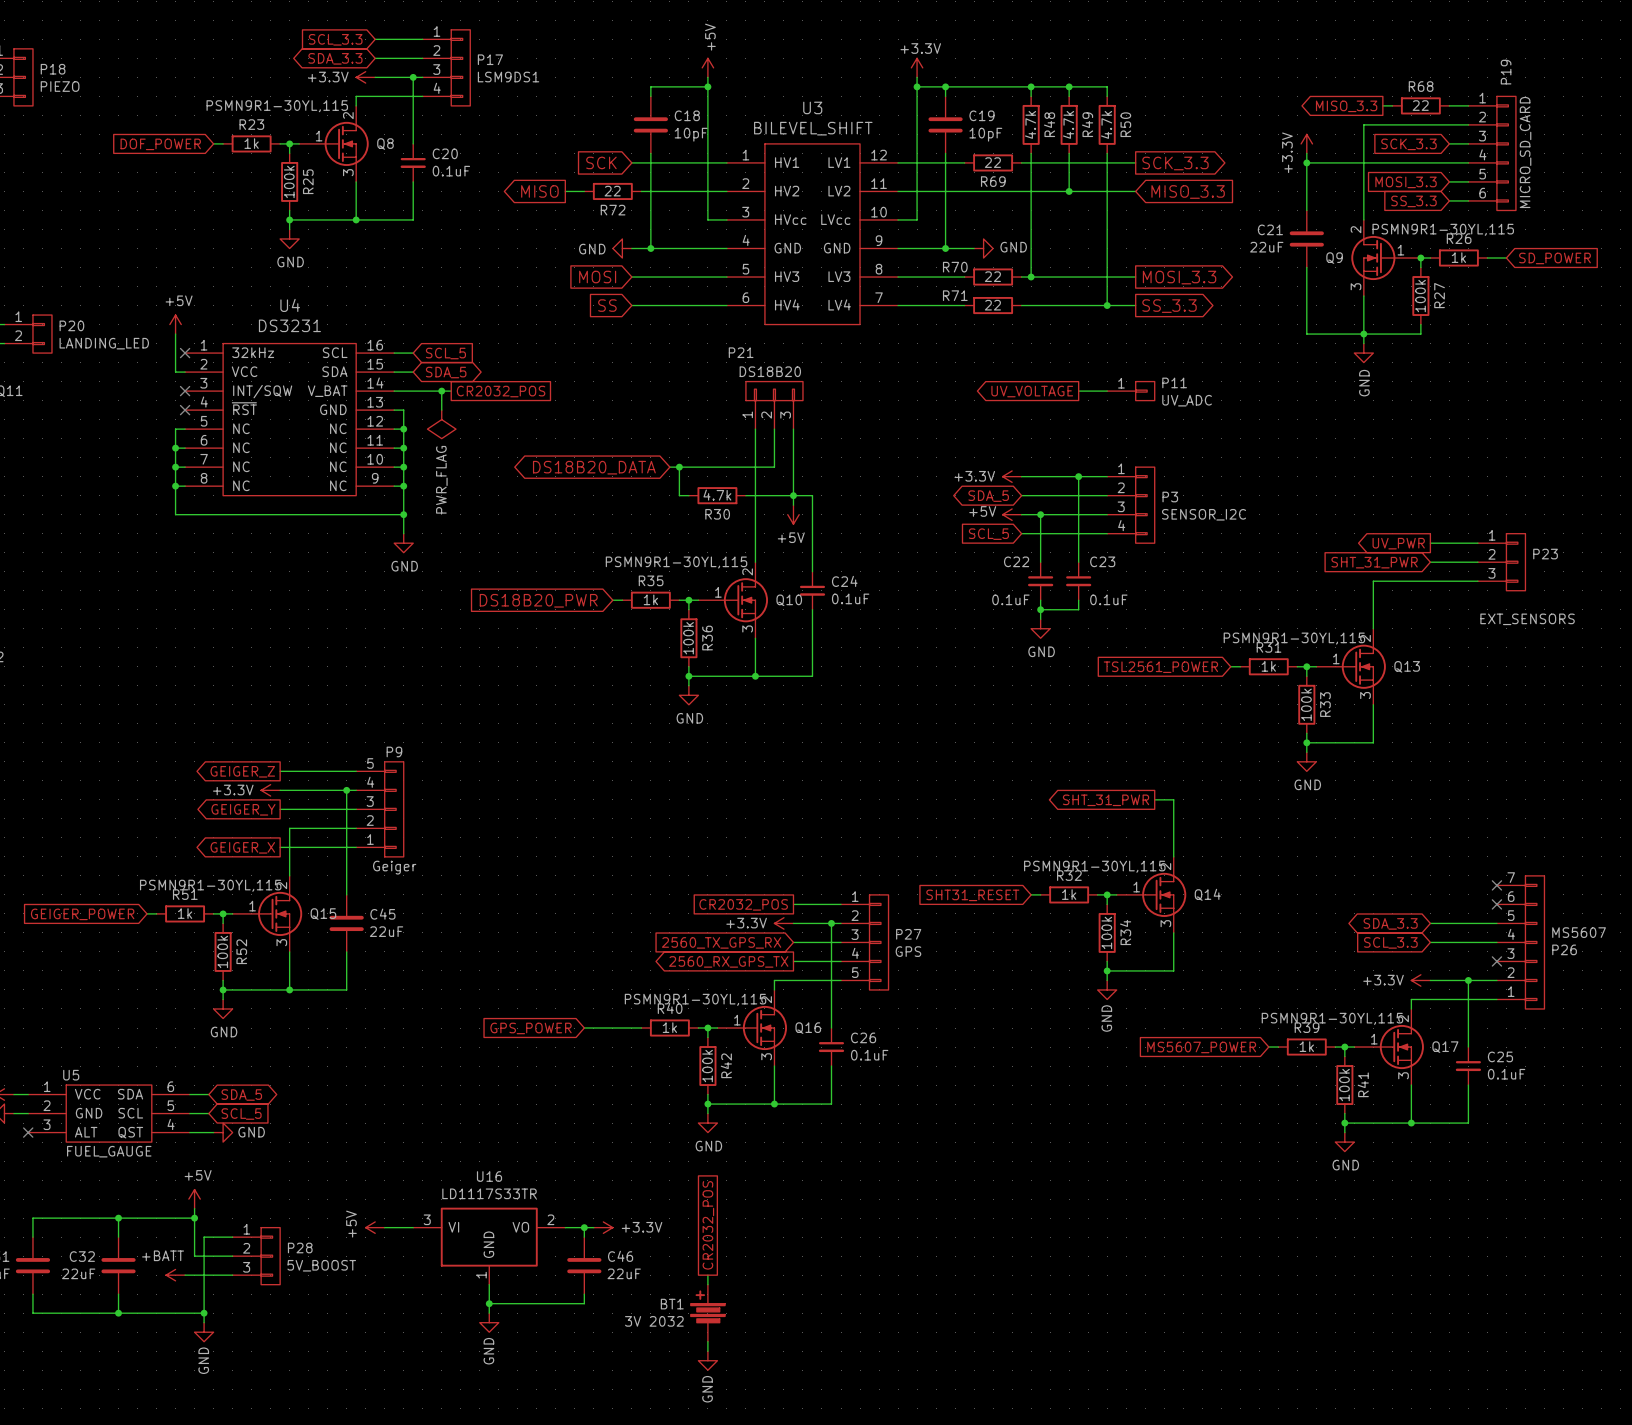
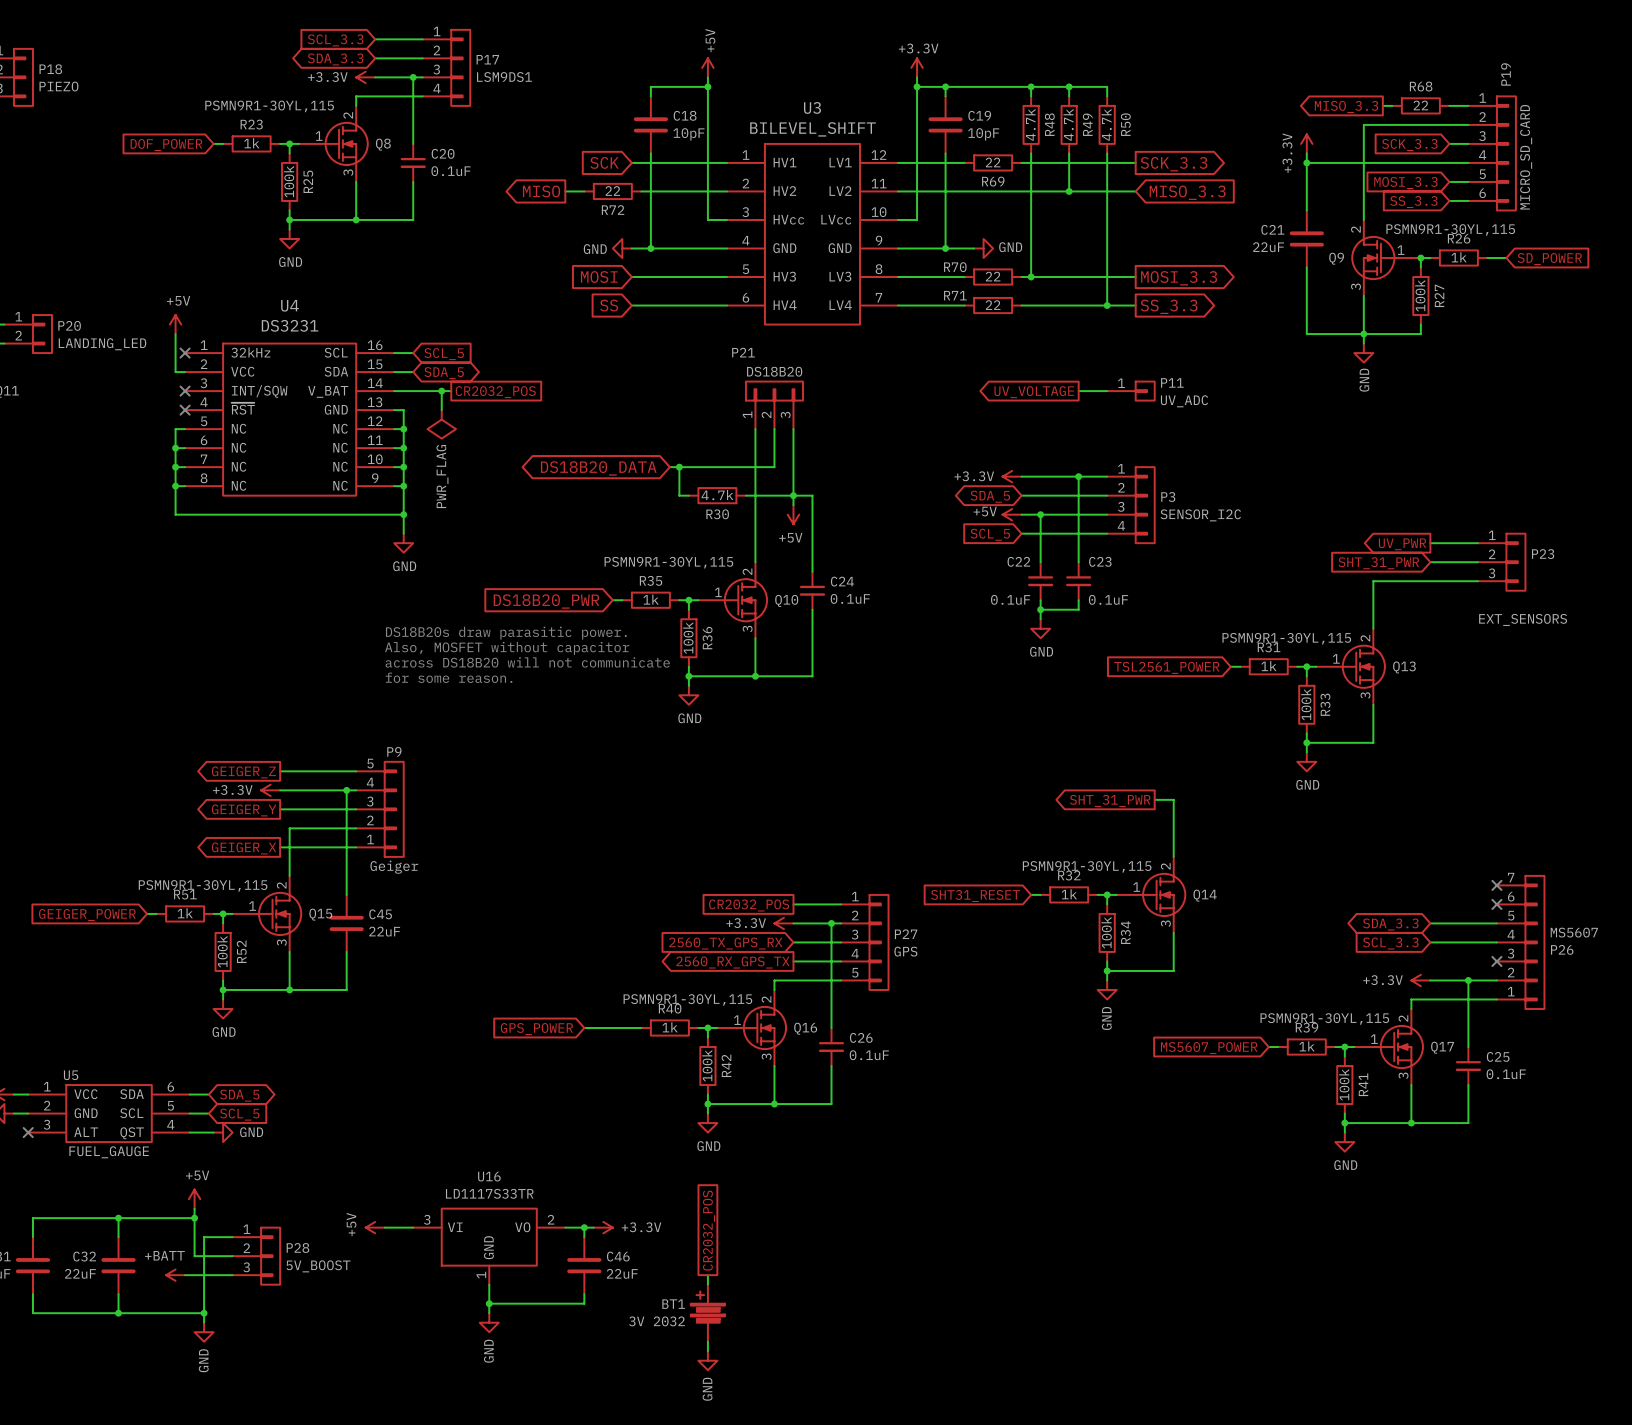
text: none -> DS18B20s draw parasitic power. (506, 633)
text: none -> Also, MOSFET without capacitor (507, 648)
text: none -> across DS18B20 will not communicate (527, 662)
text: none -> for some reason. (449, 677)

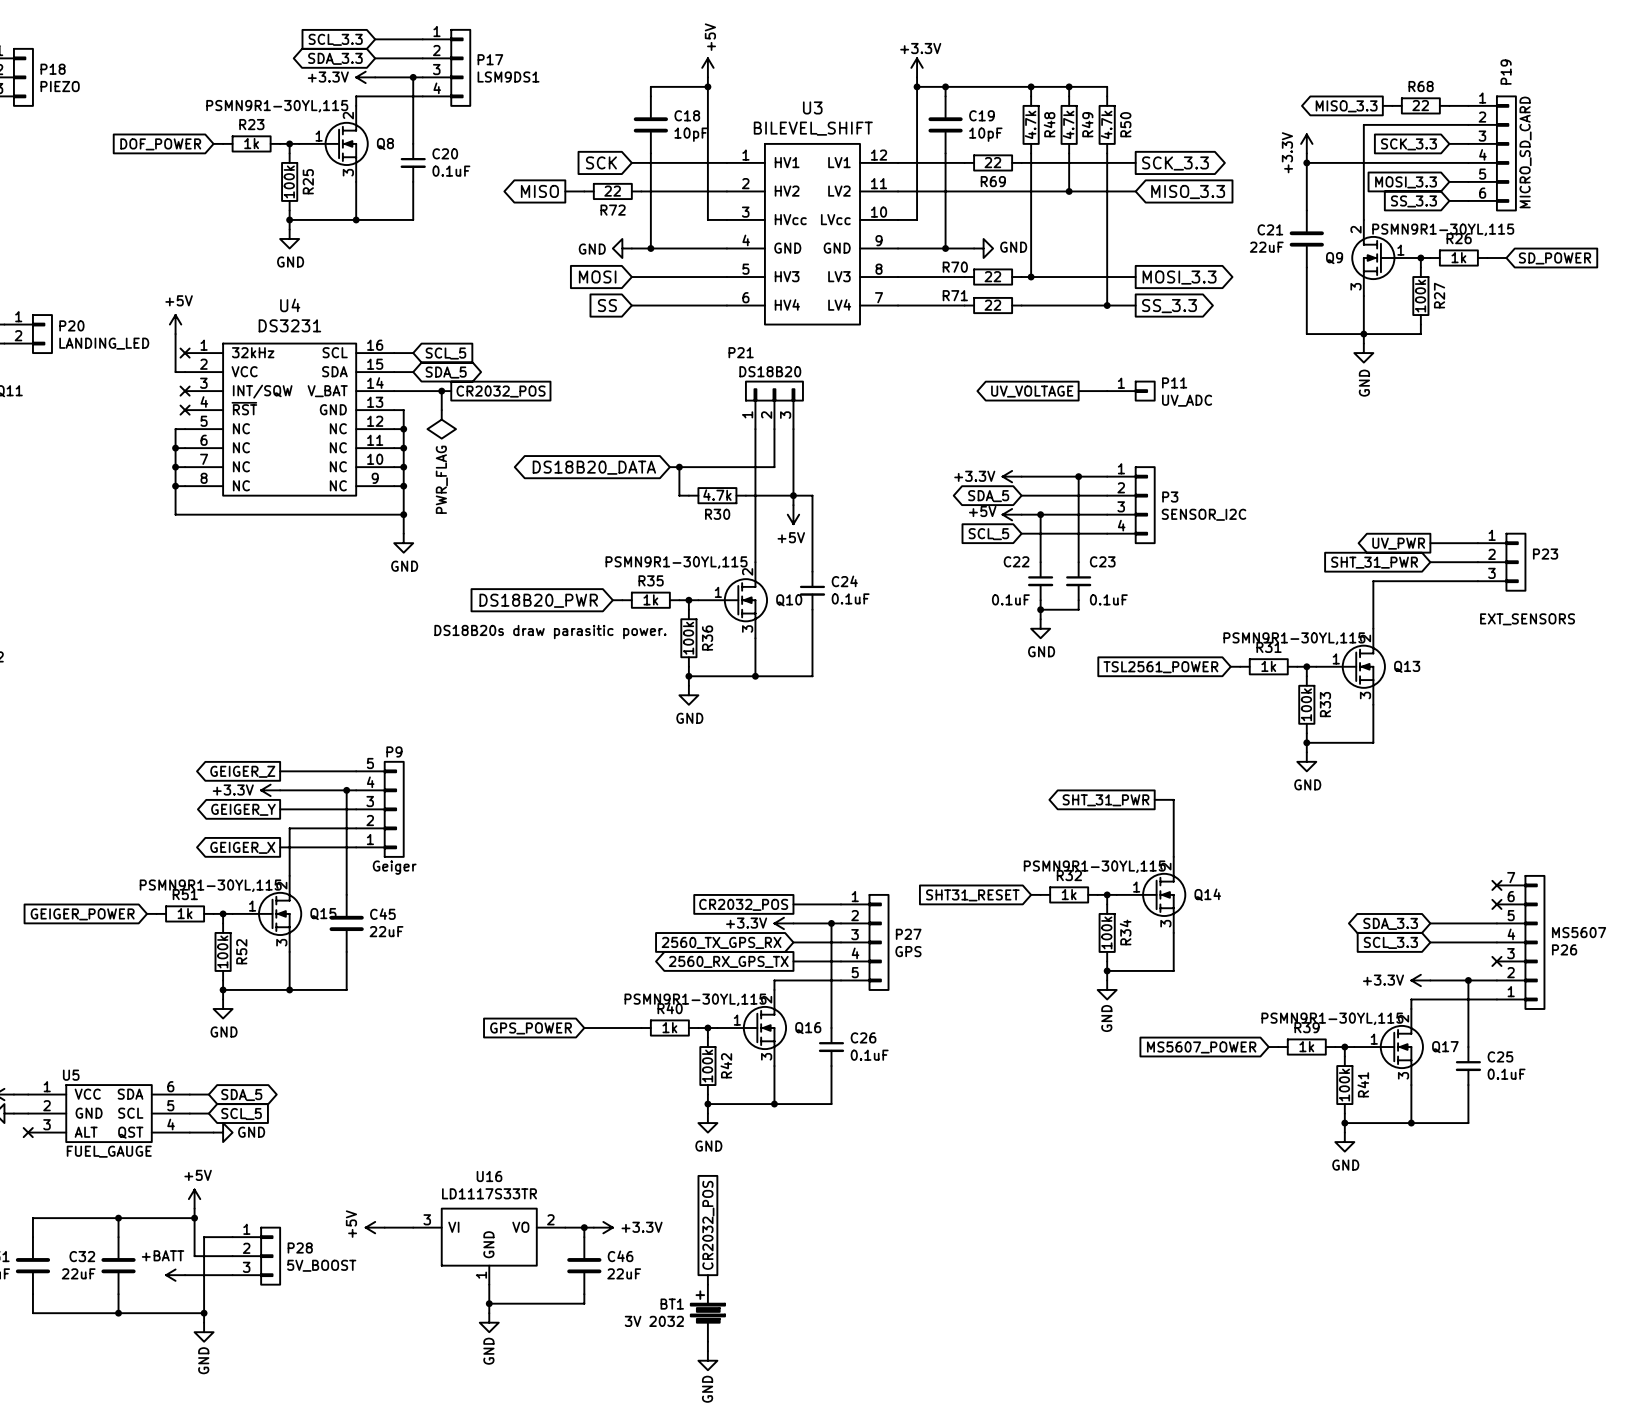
text position: DS18B20s draw parasitic power. (506, 633) -> DS18B20s draw parasitic power. (550, 632)
text: Also, MOSFET without capacitor (507, 648) -> none
text: across DS18B20 will not communicate (527, 662) -> none
text: for some reason. (449, 677) -> none

